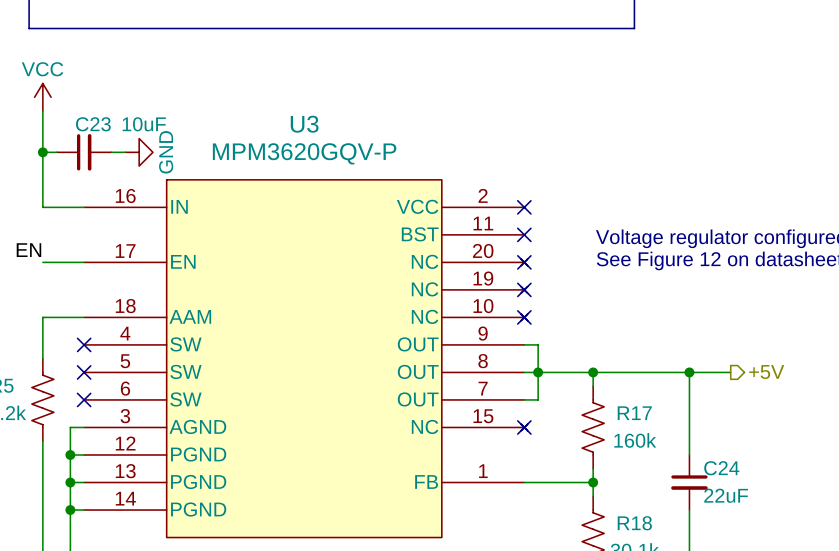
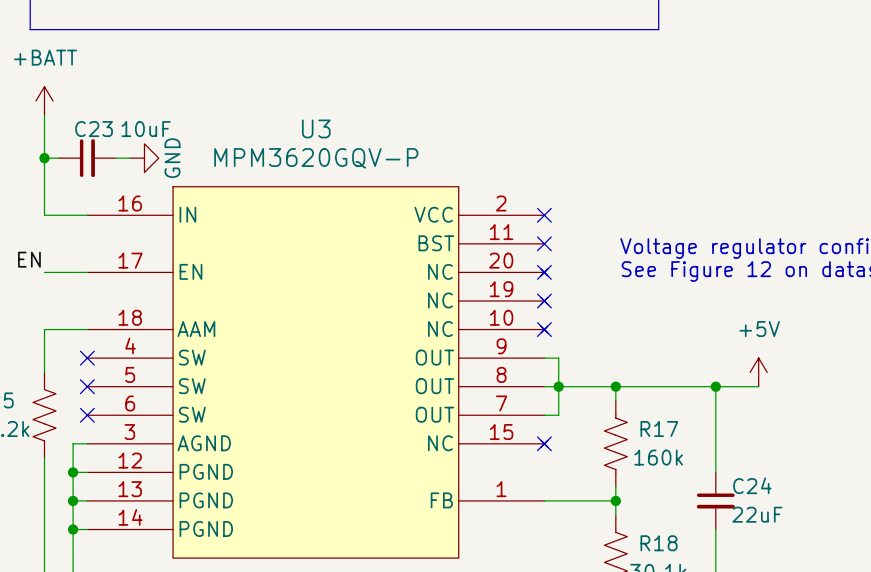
power symbol: VCC (42, 97) -> +BATT (44, 101)
power symbol: none -> +5V (758, 372)
hierarchical label: +5V (766, 372) -> none

